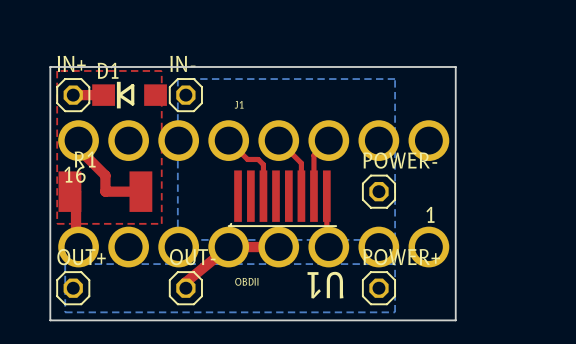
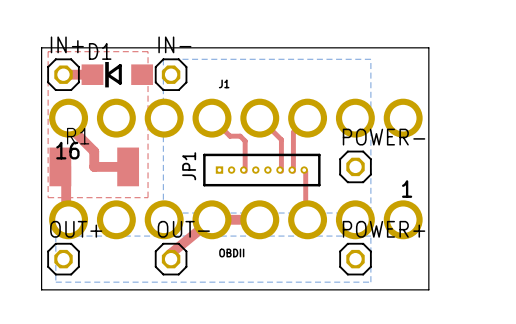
JP1: none -> (261, 170)
U1: (282, 198) -> none

